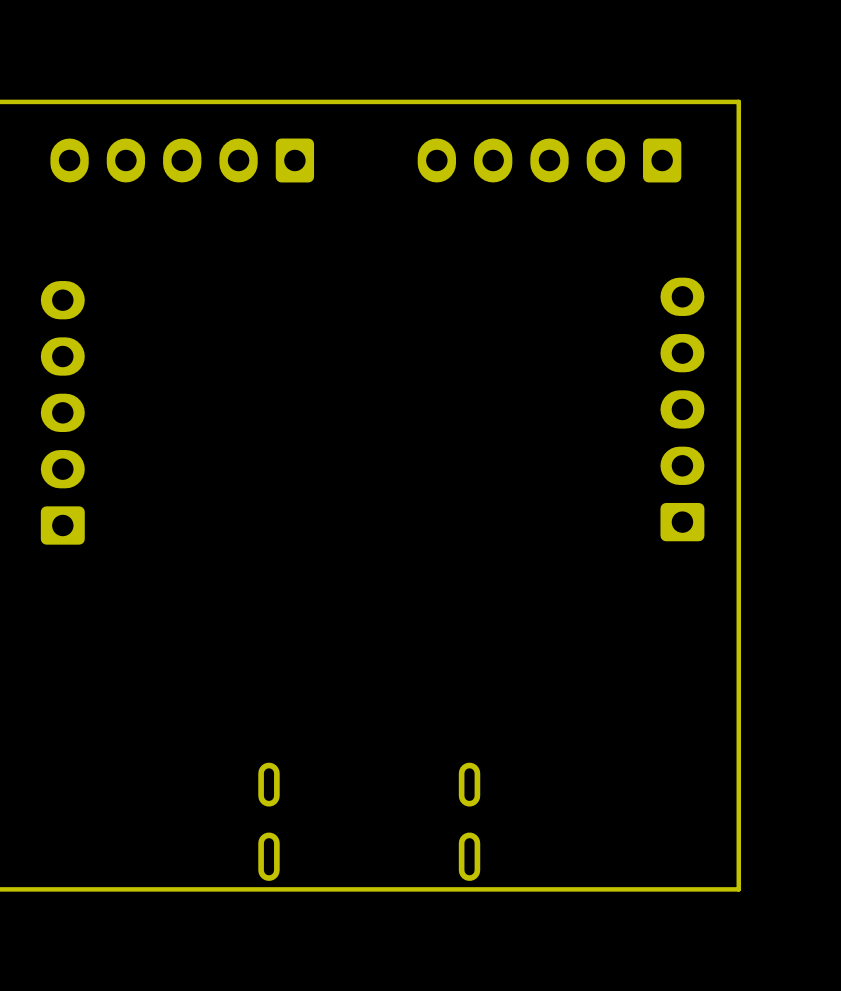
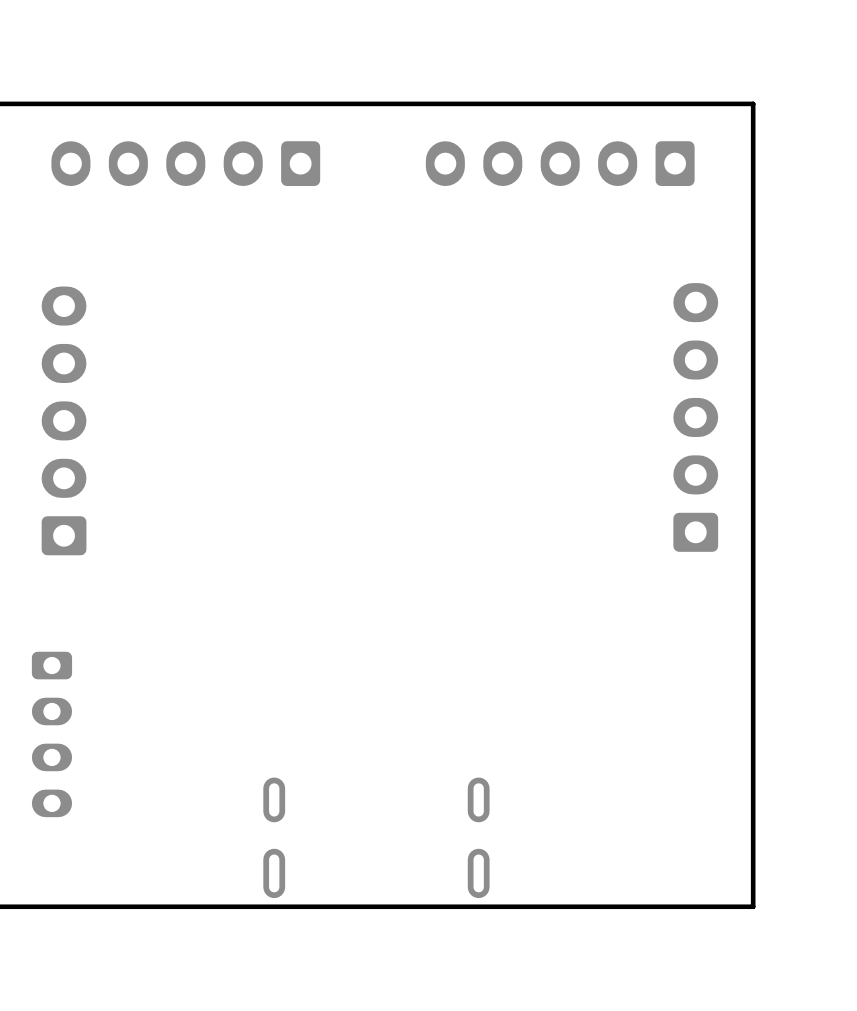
part: none -> (51, 734)

